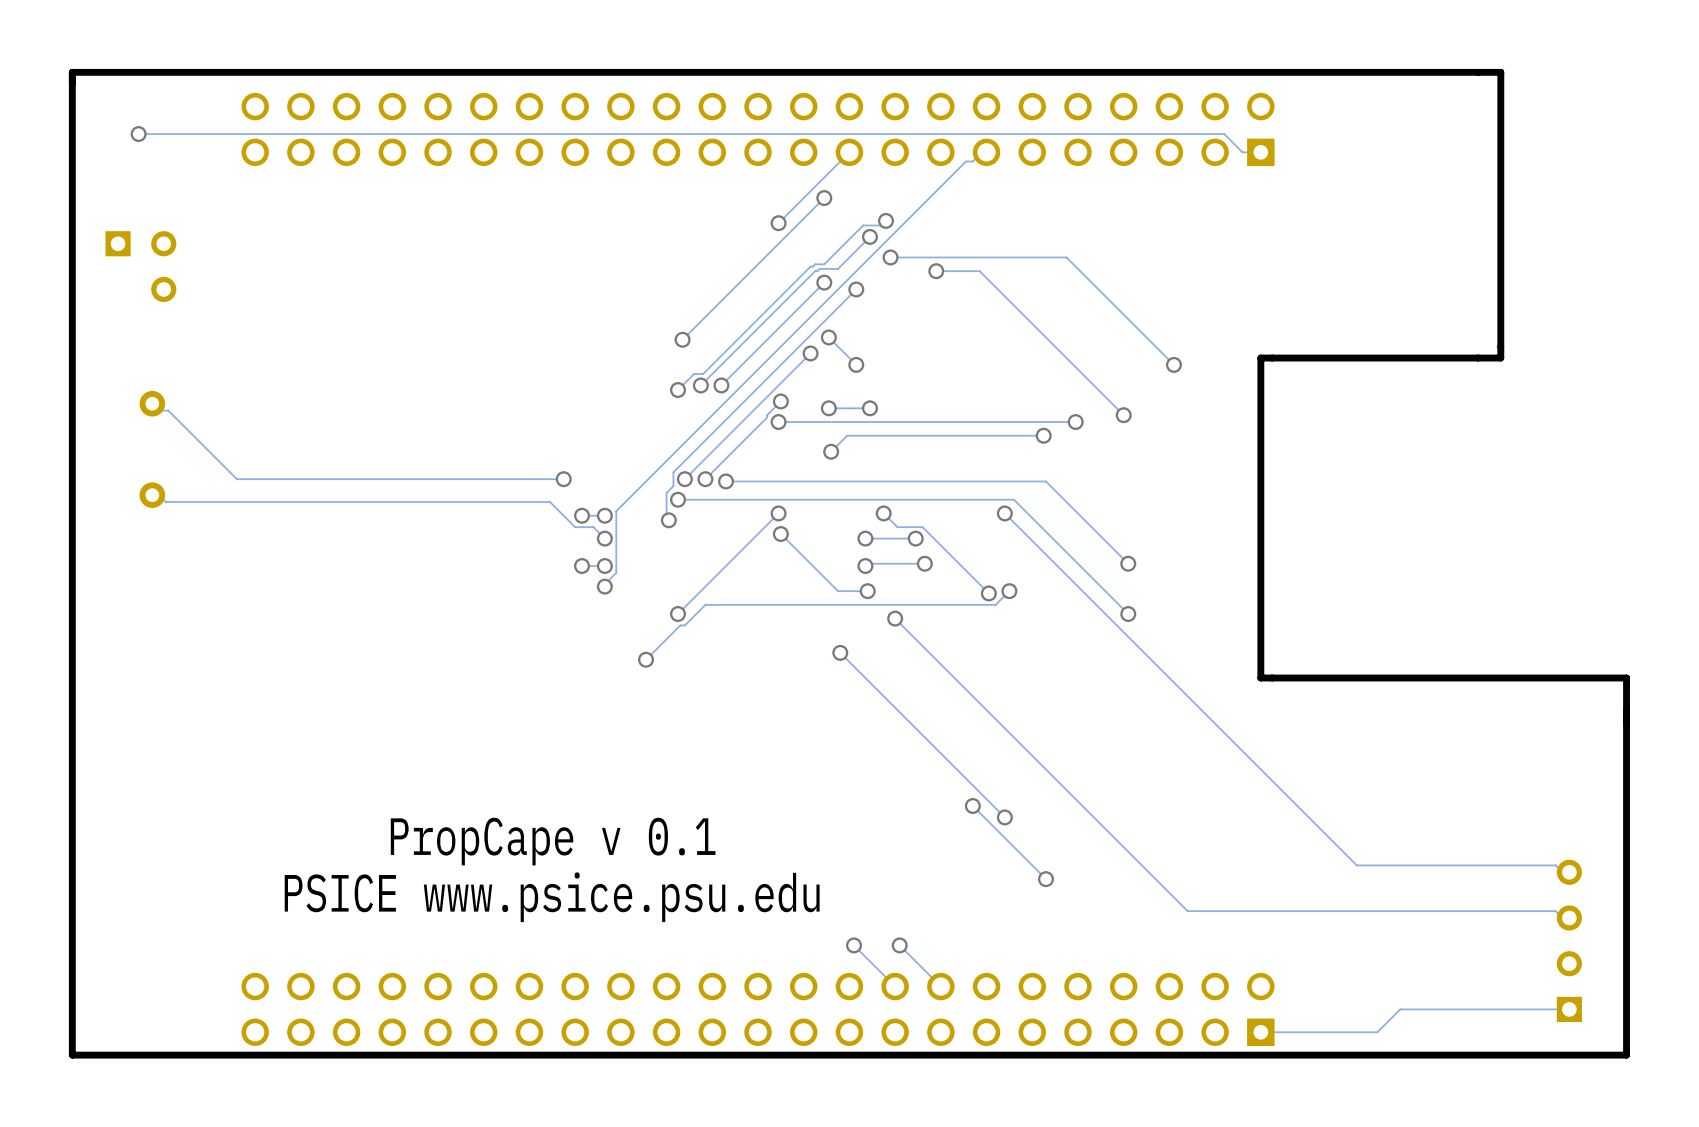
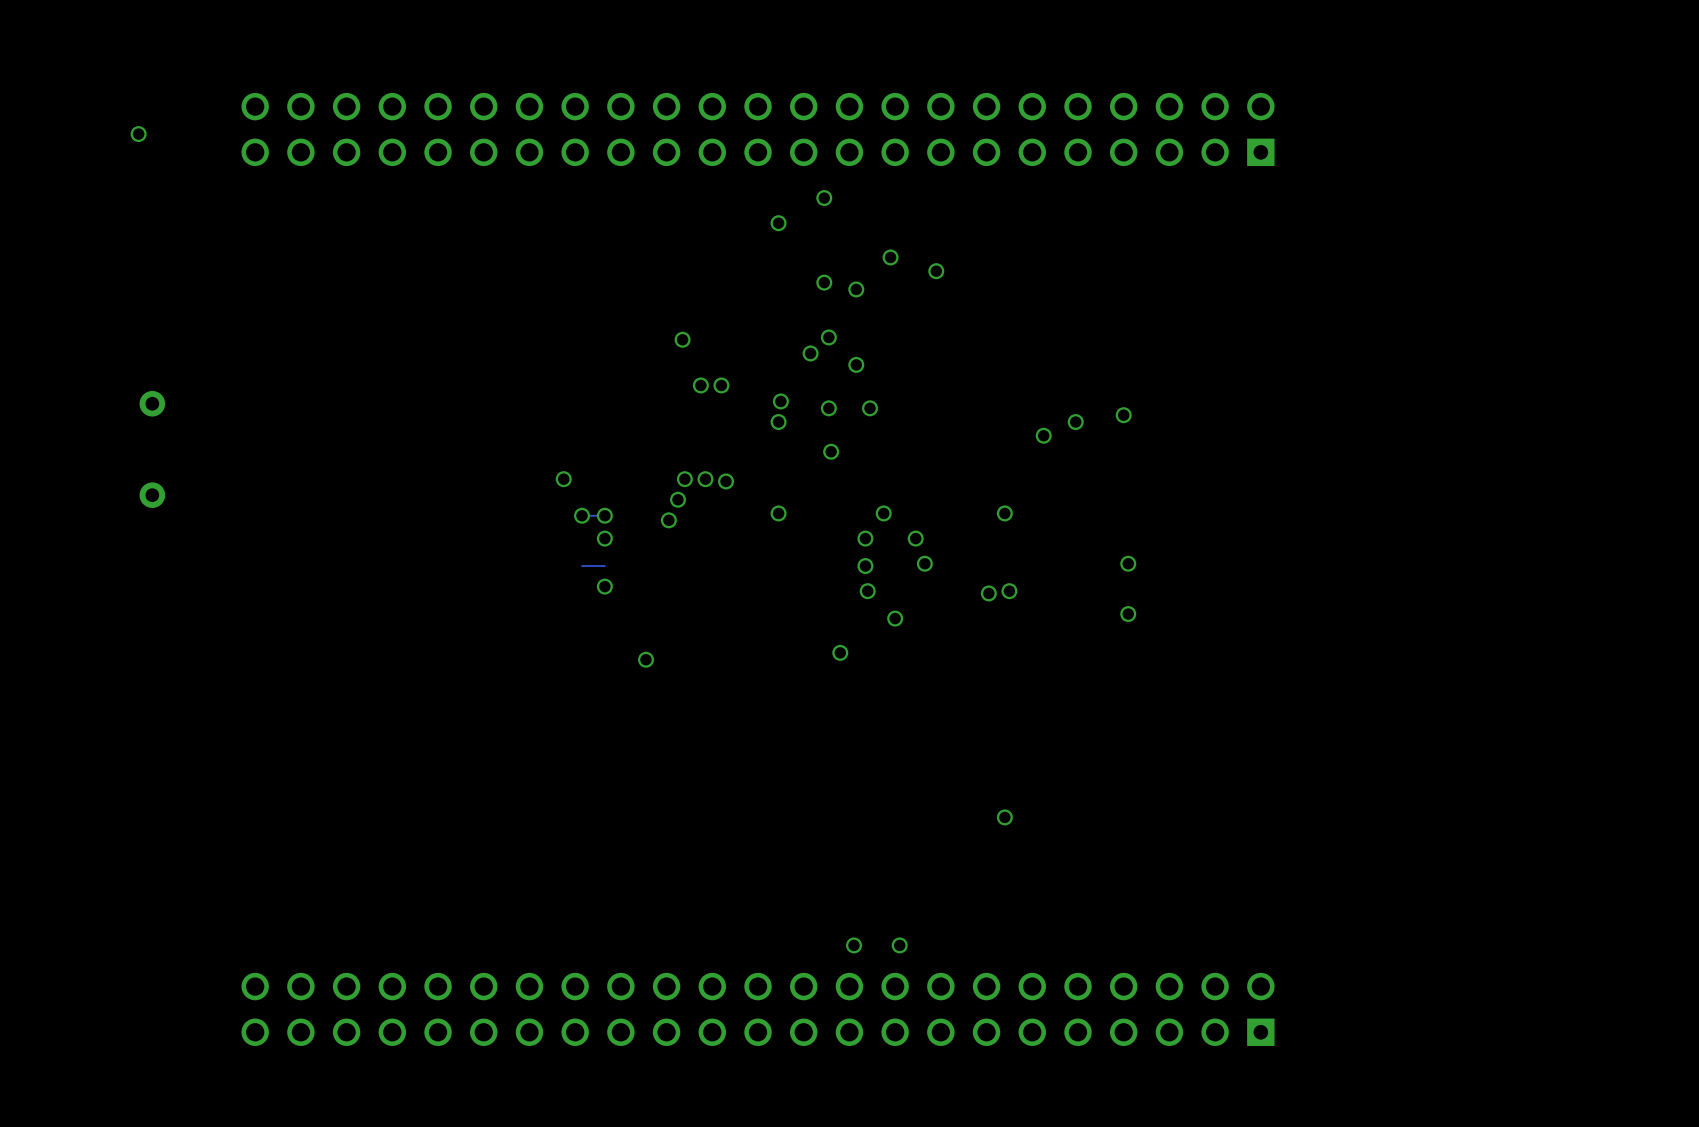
board edge: (1500, 72) (1500, 358) (1260, 358) (1260, 678) (1626, 678) (1626, 1055) (72, 1055) (72, 72) (1500, 72) -> none
track: (138, 134) (1224, 134) (1242, 152) (1260, 152) -> none
track: (849, 152) (778, 223) -> none
track: (986, 152) (981, 152) (972, 161) (965, 161) (616, 511) (616, 572) (604, 586) -> none
track: (824, 198) (682, 339) -> none
track: (886, 220) (881, 225) (863, 225) (824, 264) (815, 264) (810, 266) (703, 374) (694, 374) (678, 390) -> none
via: (886, 220) -> none
track: (870, 236) (838, 268) (819, 268) (815, 271) (700, 385) -> none
via: (870, 236) -> none
track: (890, 257) (1066, 257) (1173, 364) -> none
part: (140, 266) -> none
track: (936, 271) (979, 271) (1123, 415) -> none
track: (824, 282) (721, 385) -> none
track: (856, 289) (673, 472) (673, 486) (666, 492) (666, 518) (668, 520) -> none
track: (828, 337) (856, 364) -> none
track: (810, 353) (684, 479) -> none
via: (1173, 364) -> none
via: (678, 390) -> none
track: (780, 401) (705, 479) -> none
track: (152, 403) (159, 410) (168, 410) (236, 479) (563, 479) -> none
track: (870, 408) (828, 408) -> none
track: (1075, 422) (778, 422) -> none
track: (1043, 435) (847, 435) (831, 451) -> none
track: (726, 481) (1045, 481) (1128, 563) -> none
track: (152, 495) (159, 495) (166, 502) (550, 502) (575, 527) (593, 527) (604, 538) -> none
track: (678, 499) (1013, 499) (1128, 614) -> none
track: (778, 513) (678, 614) -> none
track: (883, 513) (897, 527) (922, 527) (988, 593) -> none
track: (1004, 513) (1356, 865) (1555, 865) (1562, 872) (1569, 872) -> none
track: (780, 534) (838, 591) (867, 591) -> none
via: (780, 534) -> none
track: (915, 538) (865, 538) -> none
track: (924, 563) (867, 563) (865, 566) -> none
via: (582, 566) -> none
via: (604, 566) -> none
track: (1009, 591) (995, 604) (705, 604) (684, 625) (680, 625) (646, 659) -> none
via: (678, 614) -> none
track: (895, 618) (1187, 911) (1555, 911) (1562, 917) (1569, 917) -> none
track: (840, 652) (1004, 817) -> none
track: (972, 806) (1045, 879) -> none
via: (972, 806) -> none
text: PropCape v 0.1 (553, 841) -> none
via: (1045, 879) -> none
text: PSICE www.psice.psu.edu (552, 897) -> none
part: (1569, 940) -> none
track: (854, 945) (895, 986) -> none
track: (899, 945) (940, 986) -> none
track: (1569, 1009) (1400, 1009) (1377, 1032) (1260, 1032) -> none

